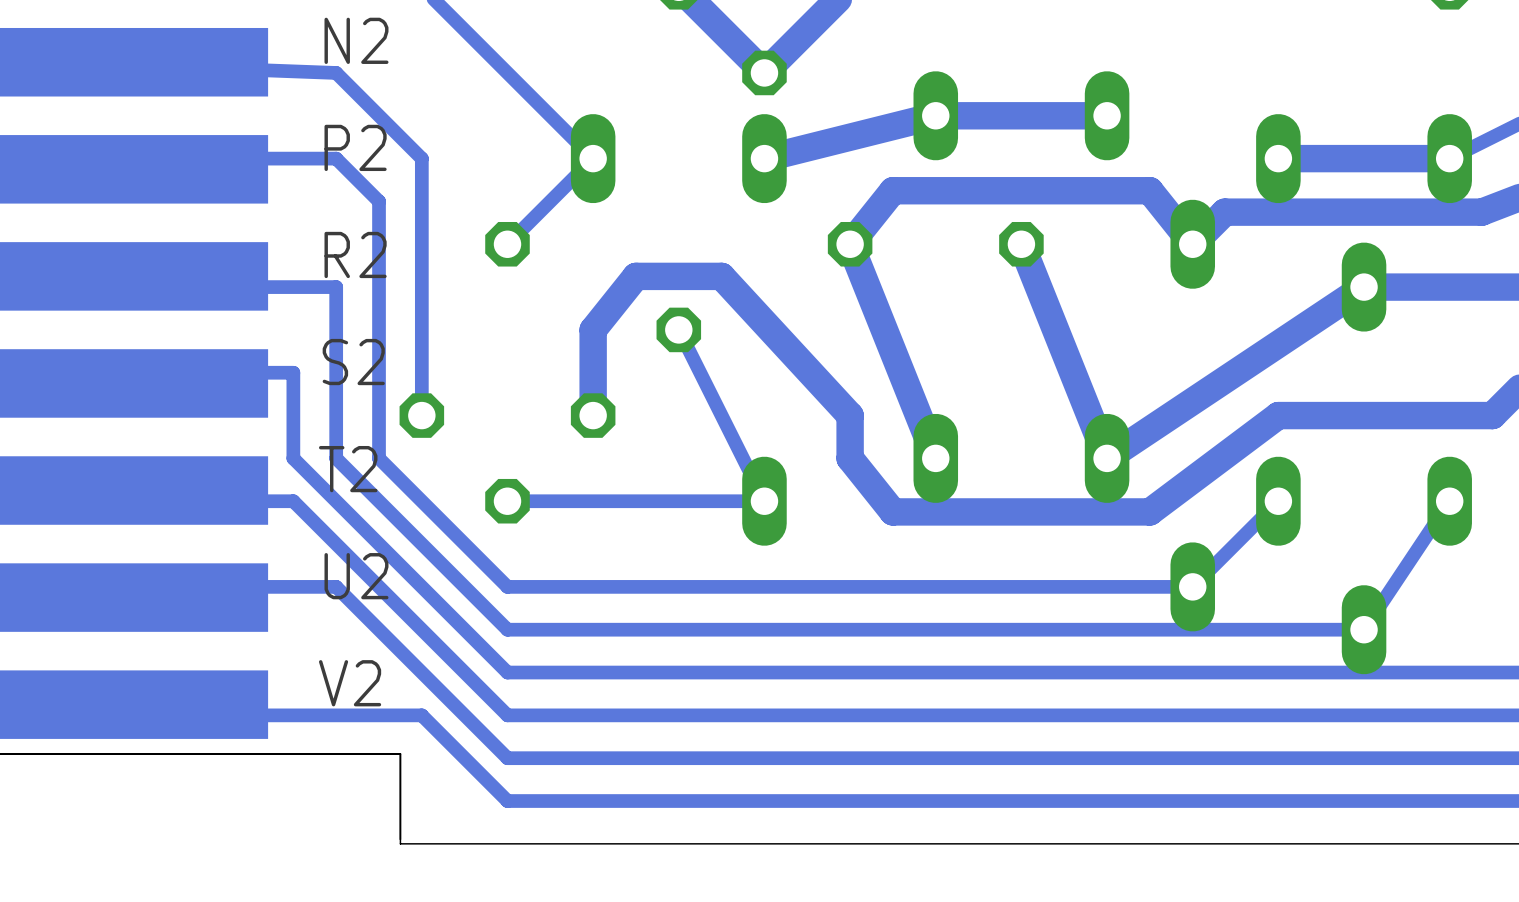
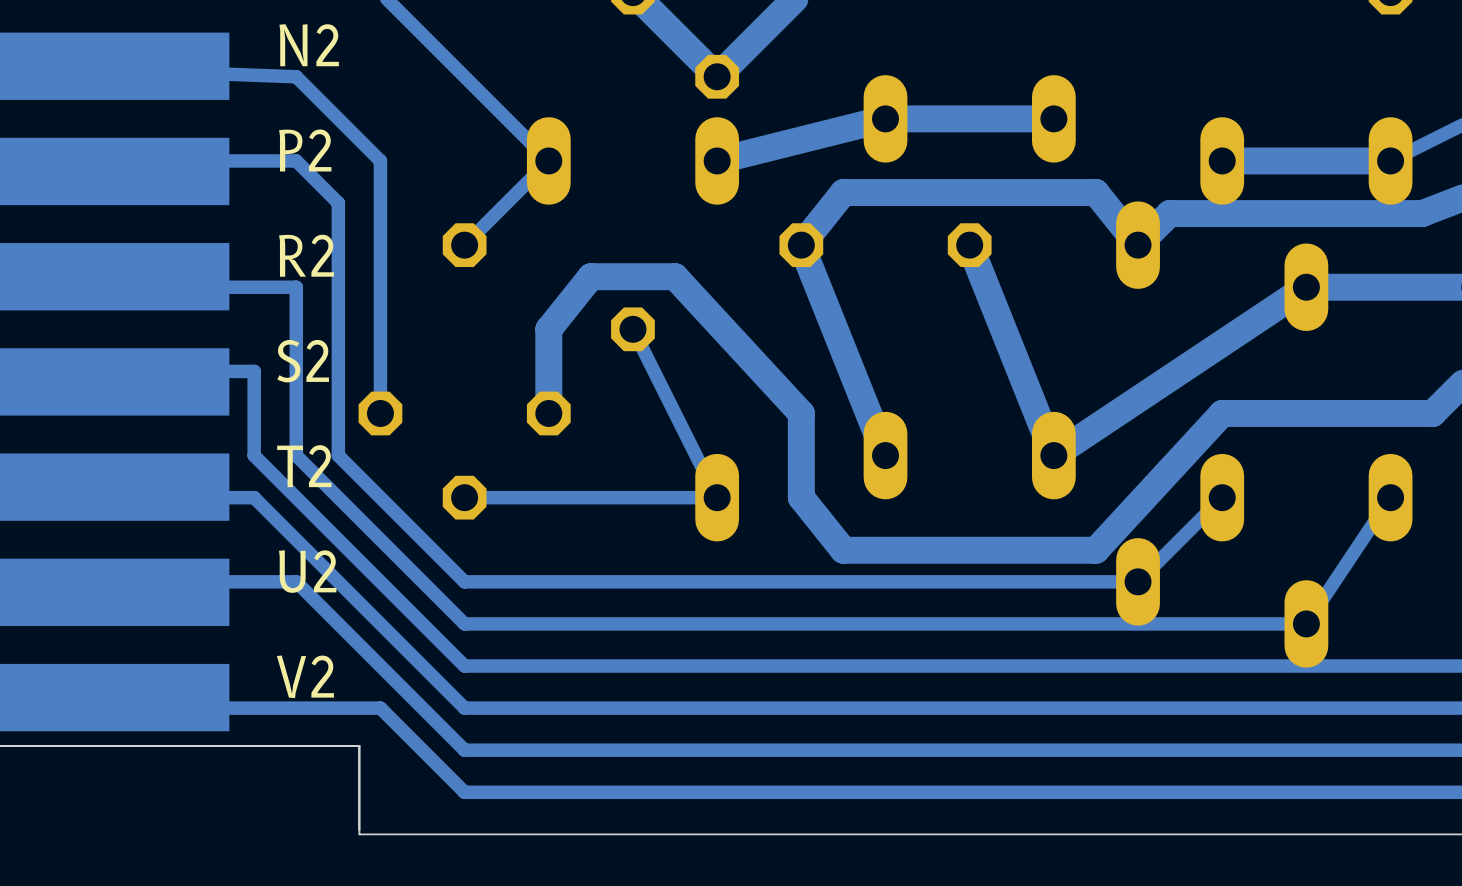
track: (1278, 415) (1149, 511) (892, 511) (850, 458) -> (1222, 413) (1095, 550) (843, 550) (801, 497) (801, 455)

